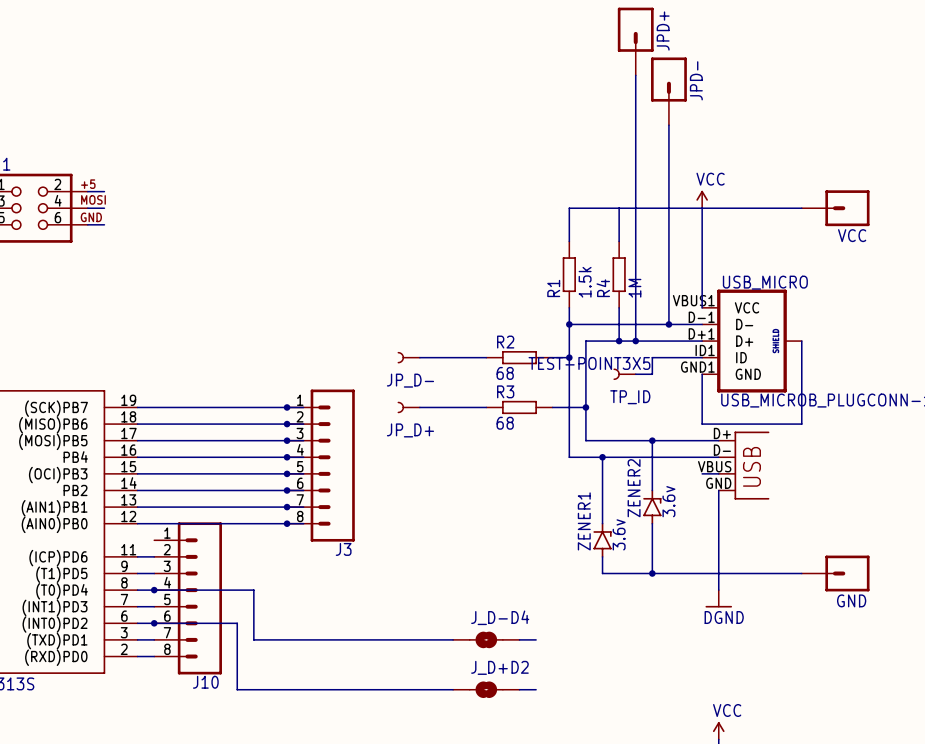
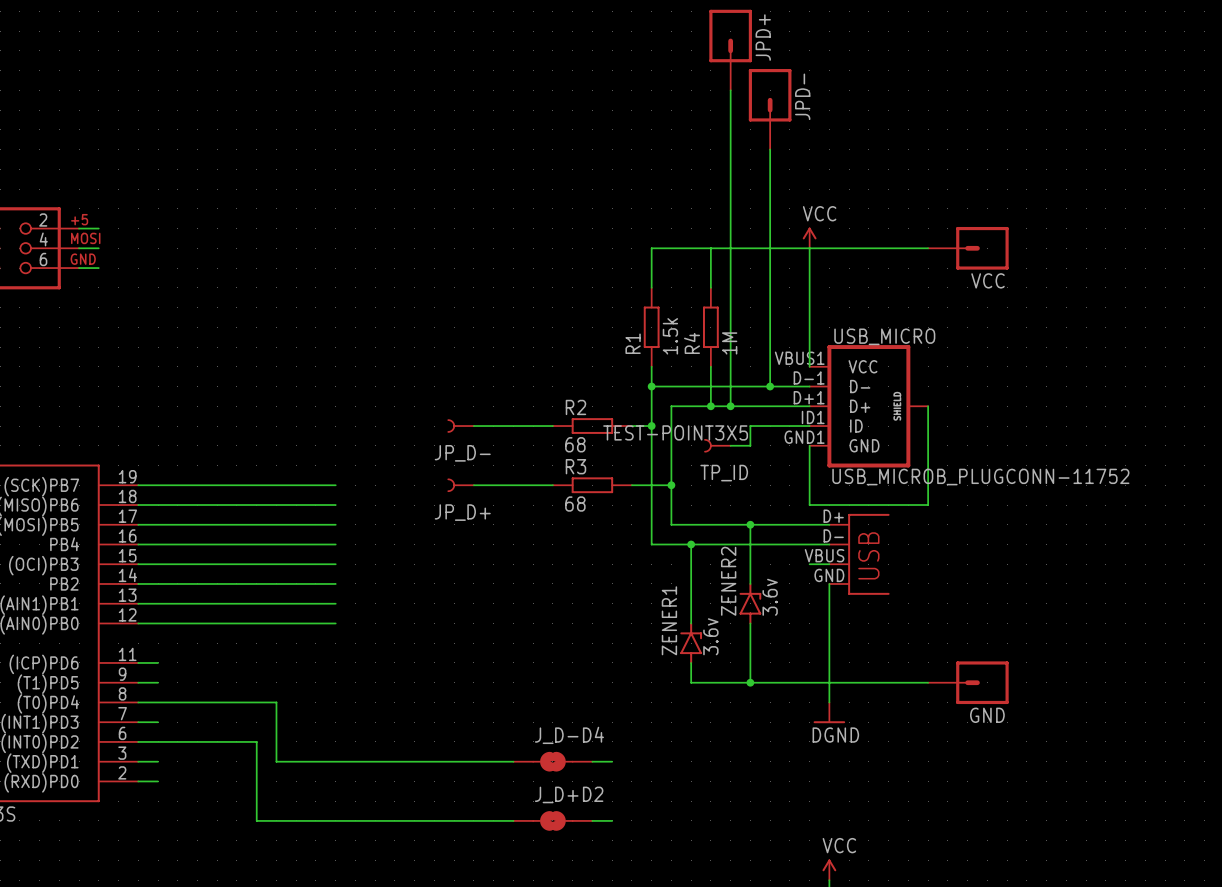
junction: (287, 407) -> none
junction: (287, 424) -> none
junction: (287, 440) -> none
junction: (287, 457) -> none
J3: (320, 465) -> none
junction: (287, 473) -> none
junction: (287, 490) -> none
junction: (287, 507) -> none
junction: (287, 523) -> none
junction: (154, 590) -> none
J10: (188, 598) -> none
junction: (154, 623) -> none

